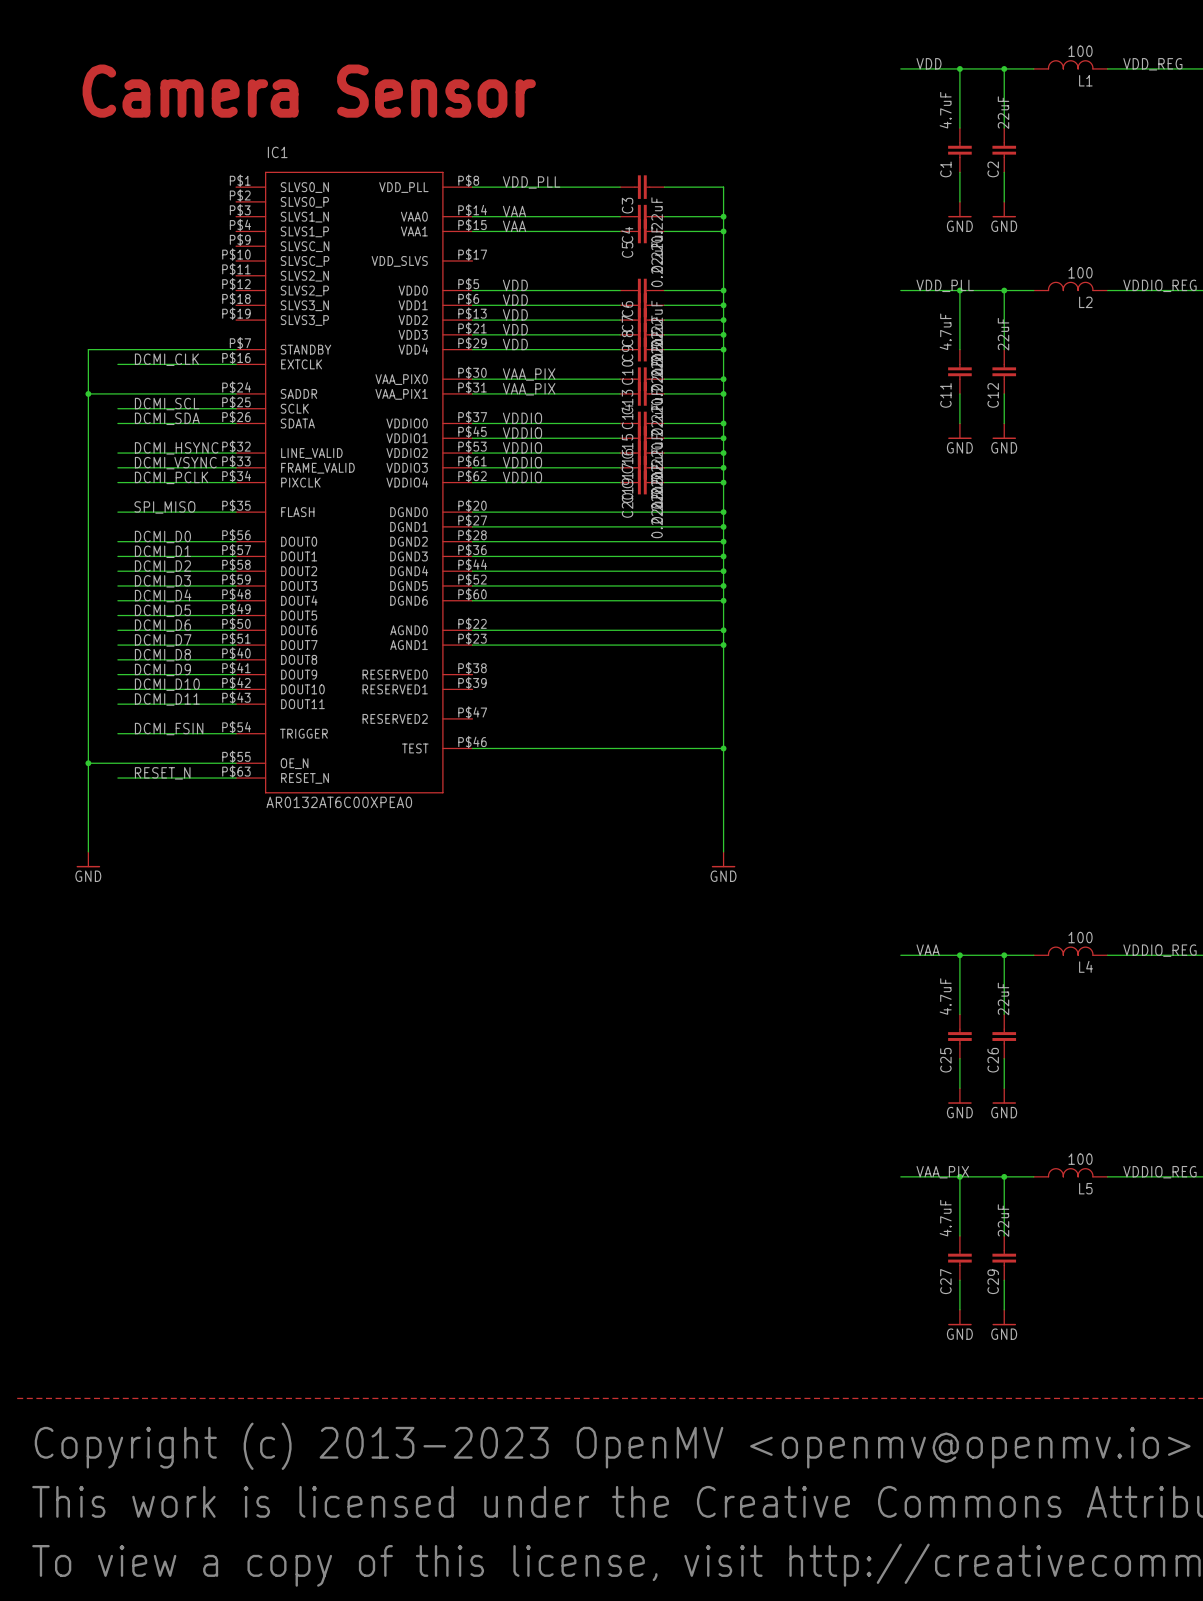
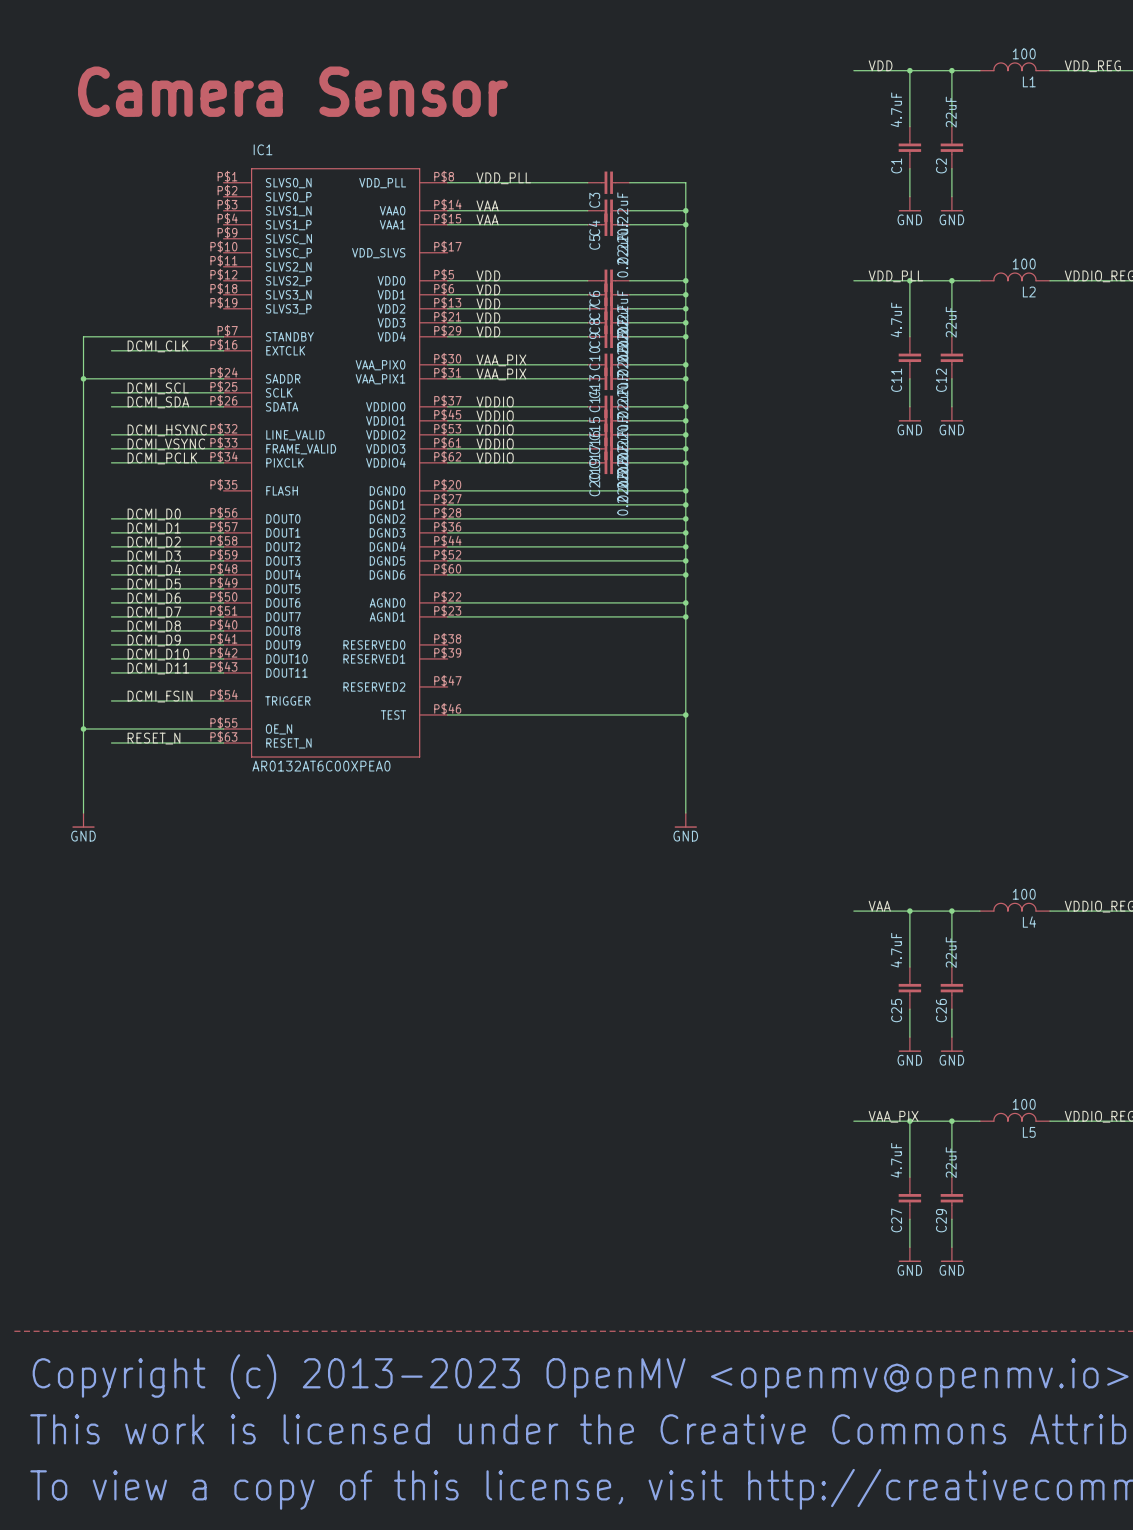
label: SPI_MISO (164, 507) -> none
wire: (117, 512) (236, 512) -> none

